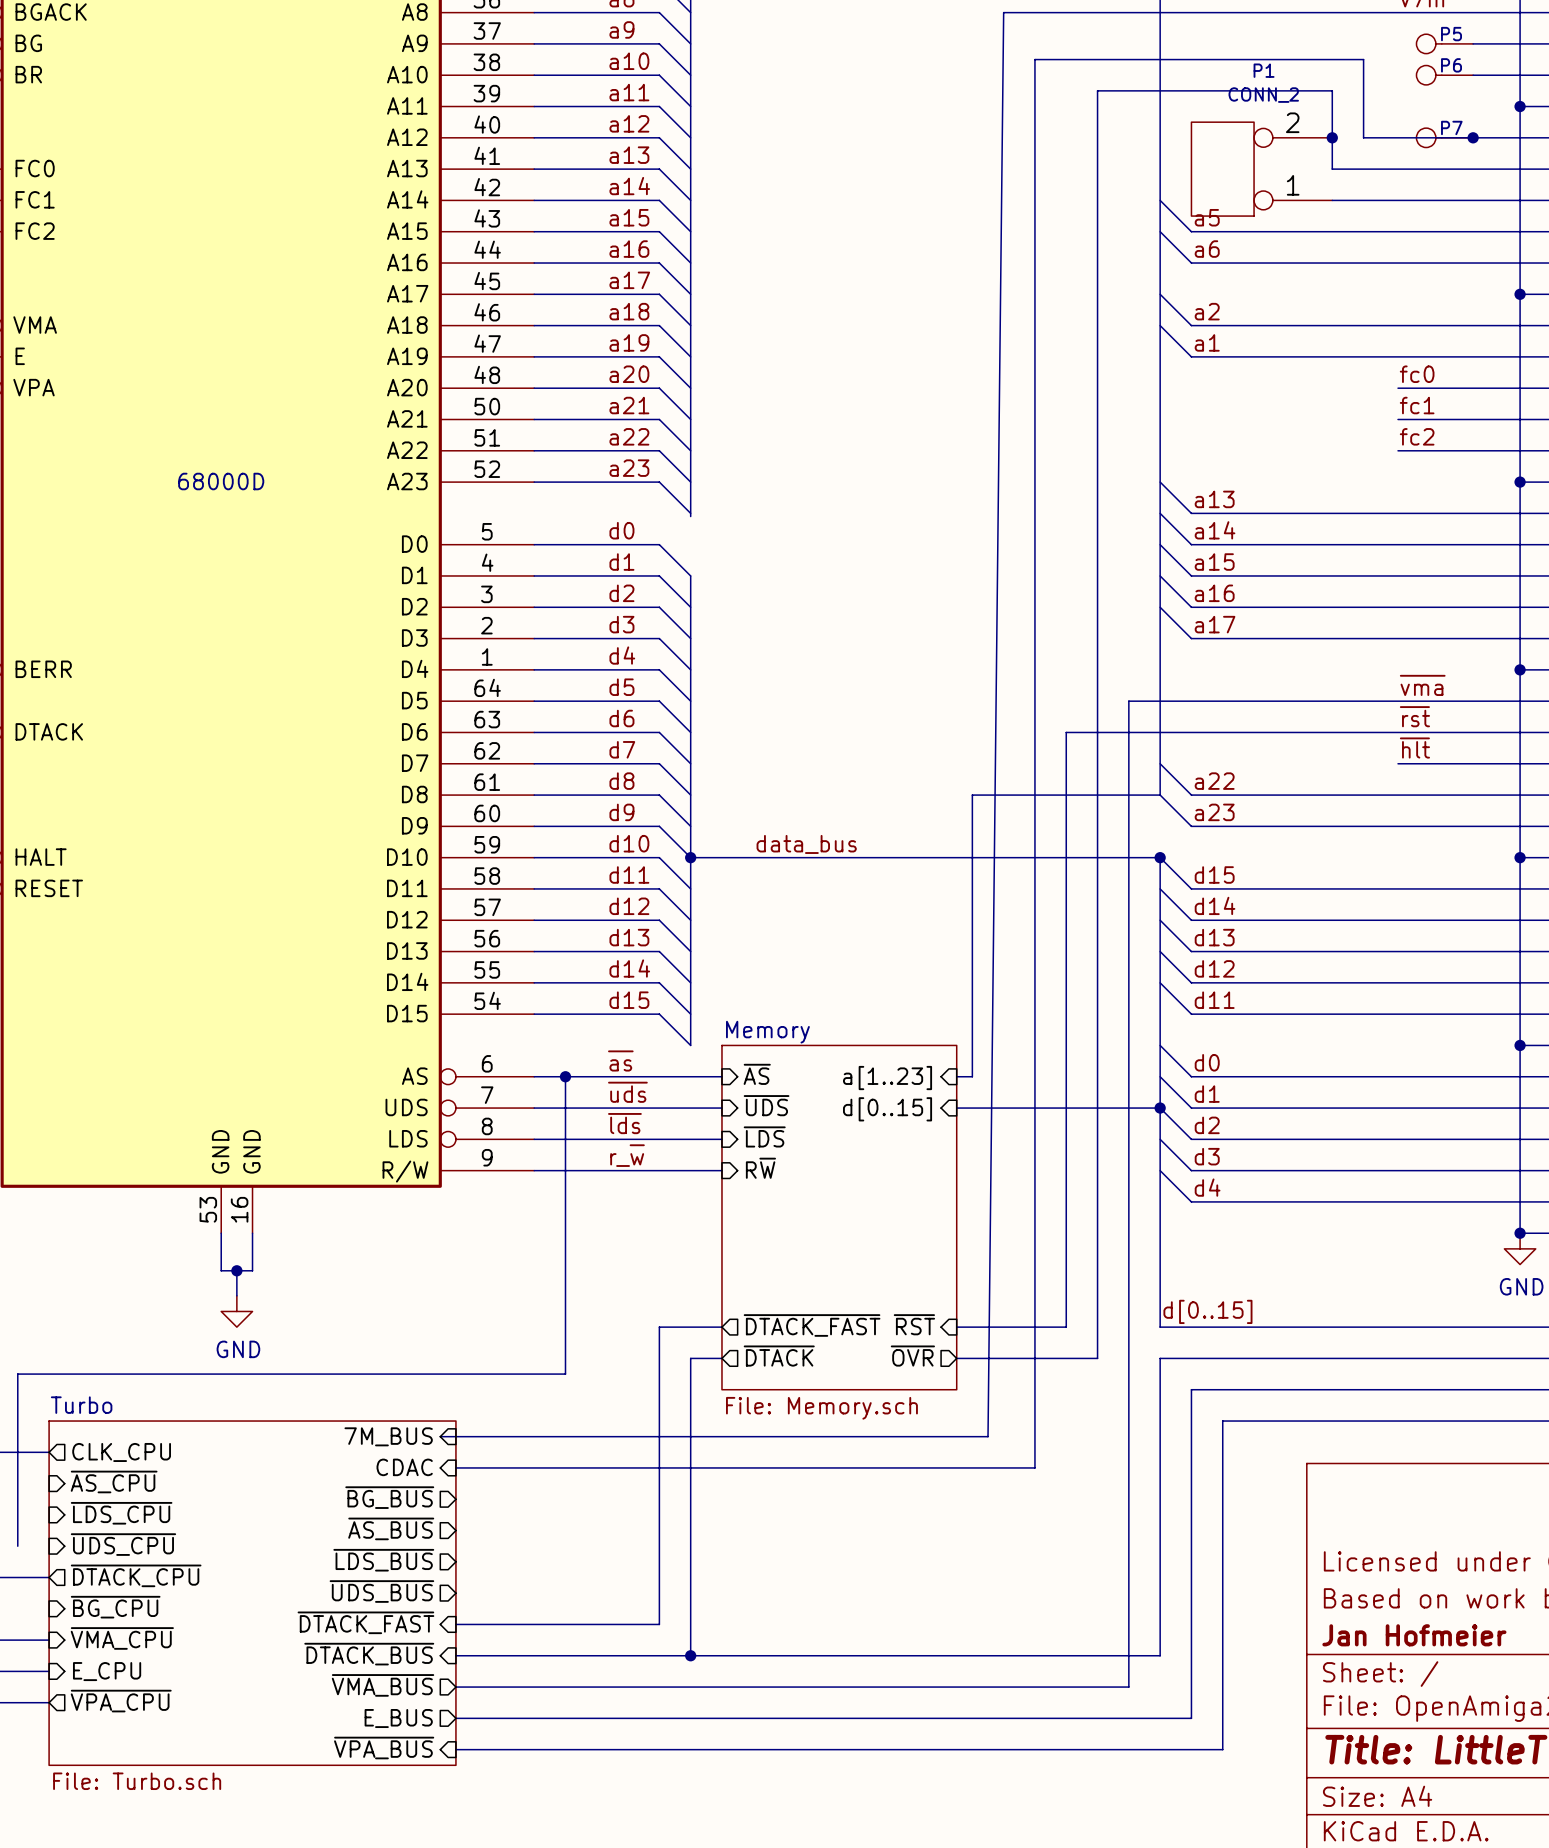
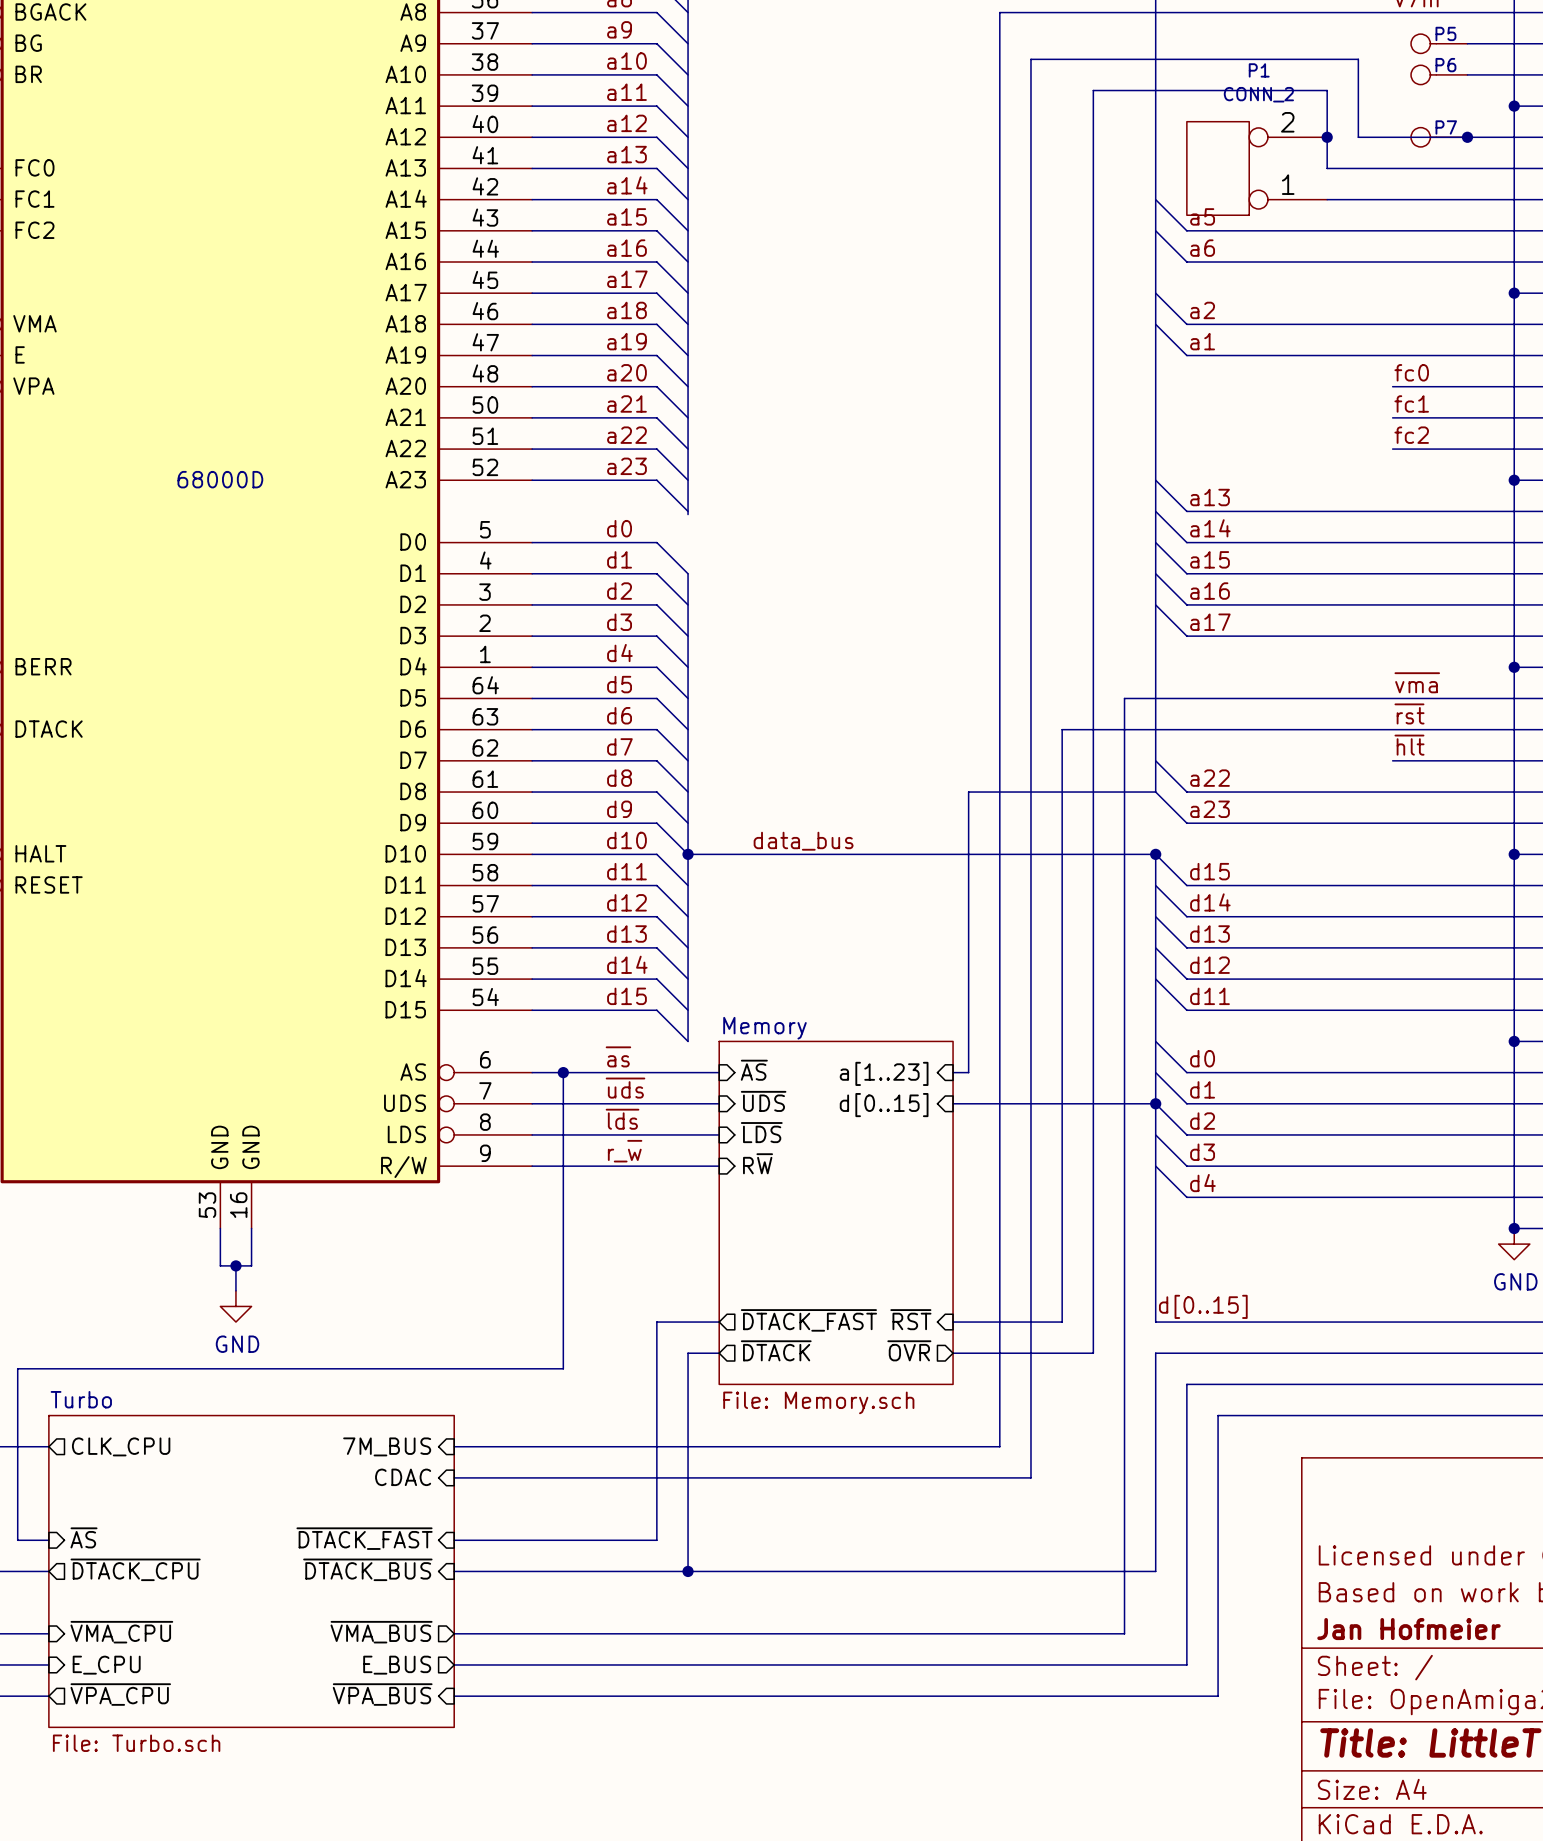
wire: (1003, 12) (988, 1436) (440, 1436) -> (999, 12) (999, 1446) (454, 1446)
sheet pin position: 7M_BUS (388, 1436) -> 7M_BUS (387, 1446)
sheet pin position: CDAC (404, 1467) -> CDAC (403, 1477)
wire: (455, 1467) (1034, 1467) -> (454, 1477) (1030, 1477) (1030, 1462)
sheet pin: ~{AS_CPU} (114, 1481) -> none
sheet pin: ~{BG_BUS} (389, 1497) -> none
sheet pin: ~{LDS_CPU} (121, 1513) -> none
sheet pin: ~{AS_BUS} (391, 1528) -> none
sheet pin: ~{UDS_CPU} (123, 1544) -> ~{AS} (83, 1537)
wire: none -> (17, 1540) (48, 1540)
wire: (659, 1546) (659, 1624) (455, 1624) -> (656, 1540) (454, 1540)
sheet pin: ~{LDS_BUS} (383, 1560) -> none
sheet Turbo: none -> File: Turbo.sch (251, 1571)
wire: (690, 1577) (690, 1655) -> none
junction: none -> (688, 1571)
wire: (1160, 1577) (1160, 1655) (455, 1655) -> (1155, 1571) (454, 1571)
sheet pin: ~{UDS_BUS} (381, 1591) -> none
sheet Turbo: File: Turbo.sch (252, 1593) -> none
sheet pin: ~{BG_CPU} (115, 1607) -> none
sheet pin position: ~{DTACK_FAST} (365, 1622) -> ~{DTACK_FAST} (364, 1538)
wire: (1128, 1640) (1128, 1687) (455, 1687) -> (1124, 1633) (454, 1633)
sheet pin position: ~{DTACK_BUS} (369, 1654) -> ~{DTACK_BUS} (367, 1569)
junction: (690, 1655) -> none
wire: (1191, 1671) (1191, 1718) (455, 1718) -> (1186, 1664) (454, 1664)
sheet pin position: ~{VMA_BUS} (383, 1685) -> ~{VMA_BUS} (381, 1632)
wire: (1222, 1702) (1222, 1749) (455, 1749) -> (1218, 1696) (454, 1696)
sheet pin position: E_BUS (398, 1718) -> E_BUS (397, 1665)
sheet pin position: ~{VPA_BUS} (384, 1748) -> ~{VPA_BUS} (382, 1694)

